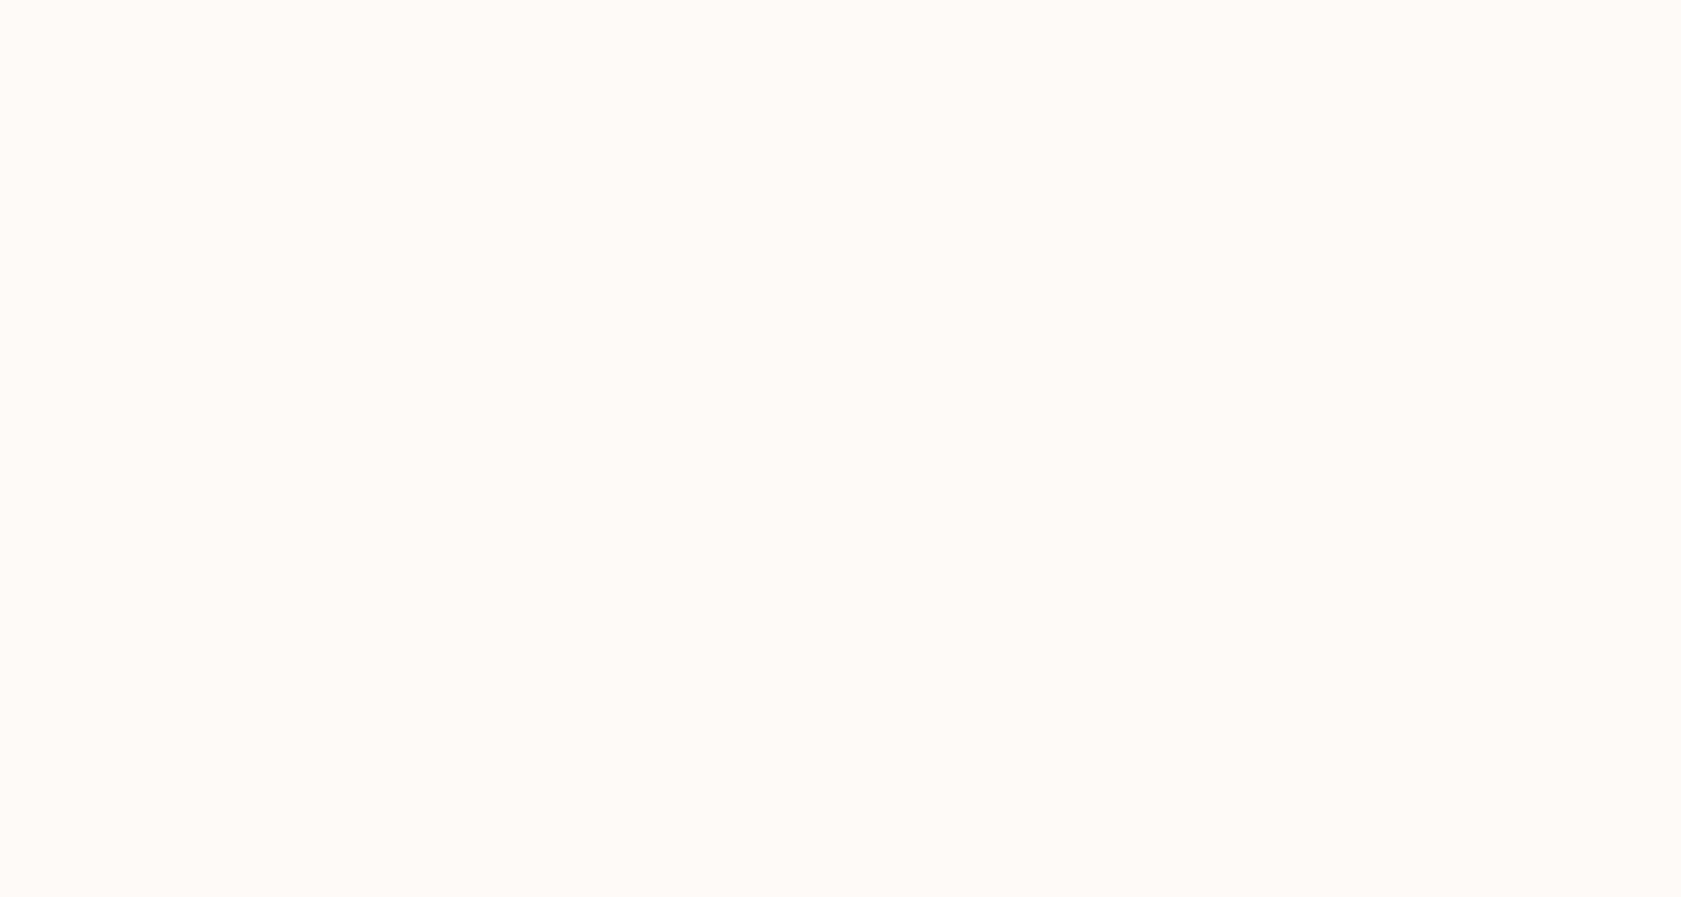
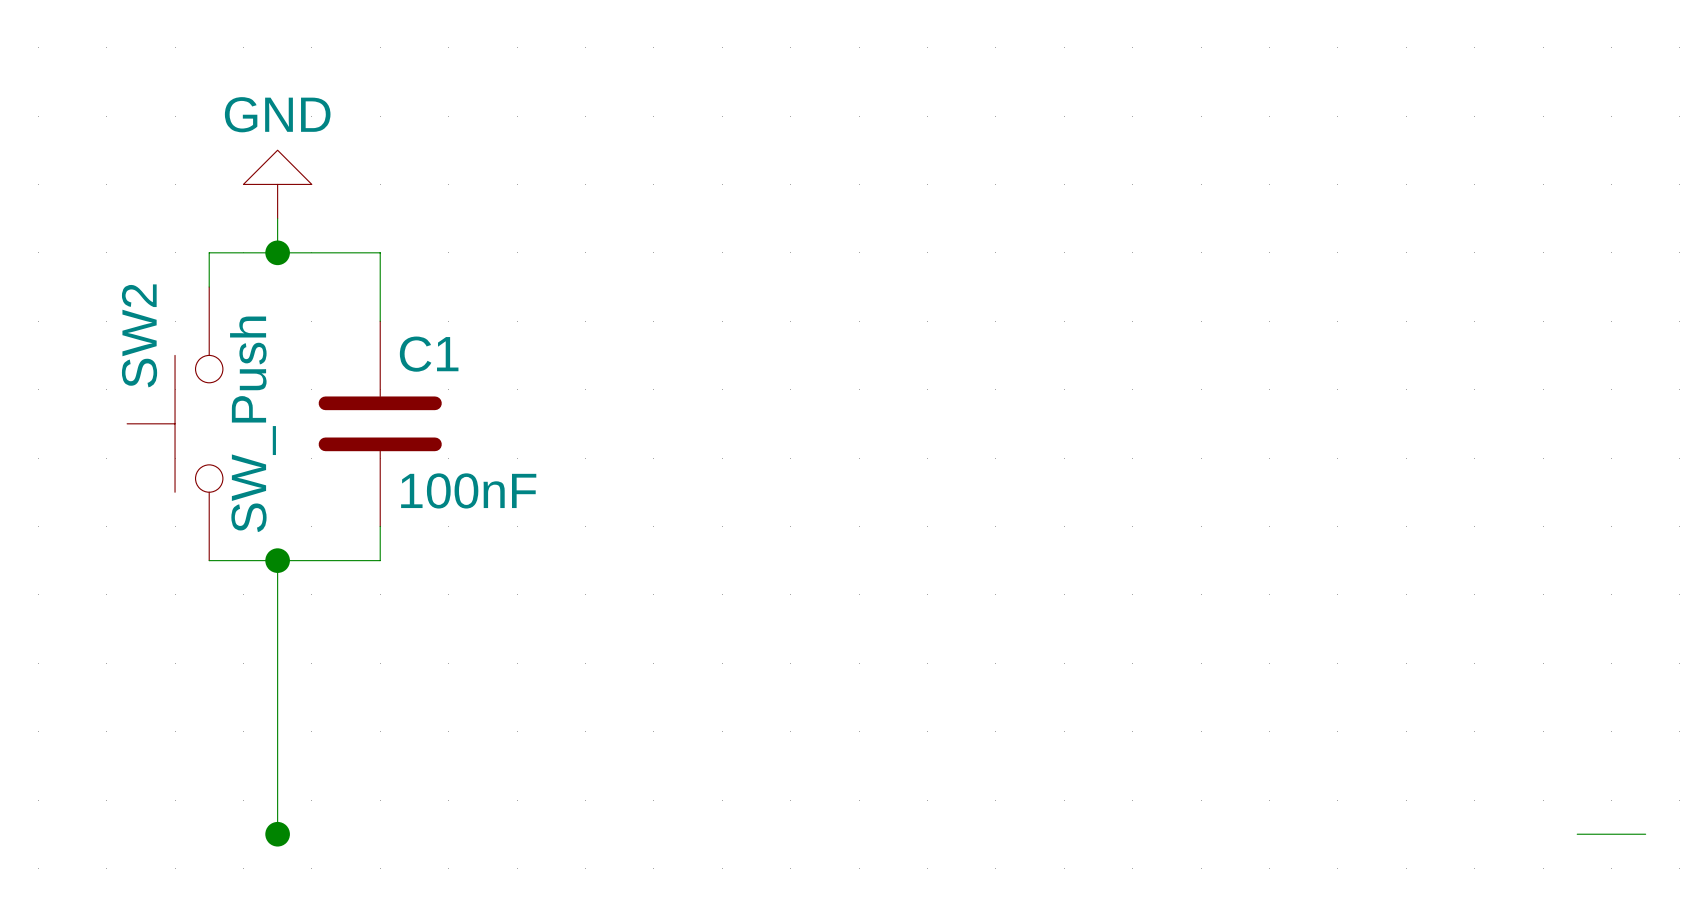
power symbol: none -> GND (277, 184)
wire: none -> (277, 218) (277, 252)
junction: none -> (277, 252)
wire: none -> (209, 287) (209, 252) (380, 252) (380, 321)
SW2: none -> SW_Push (175, 423)
C1: none -> 100nF (380, 423)
wire: none -> (380, 526) (380, 560) (209, 560)
wire: none -> (277, 560) (277, 834)
junction: none -> (277, 560)
junction: none -> (277, 834)
wire: none -> (1577, 834) (1645, 834)

